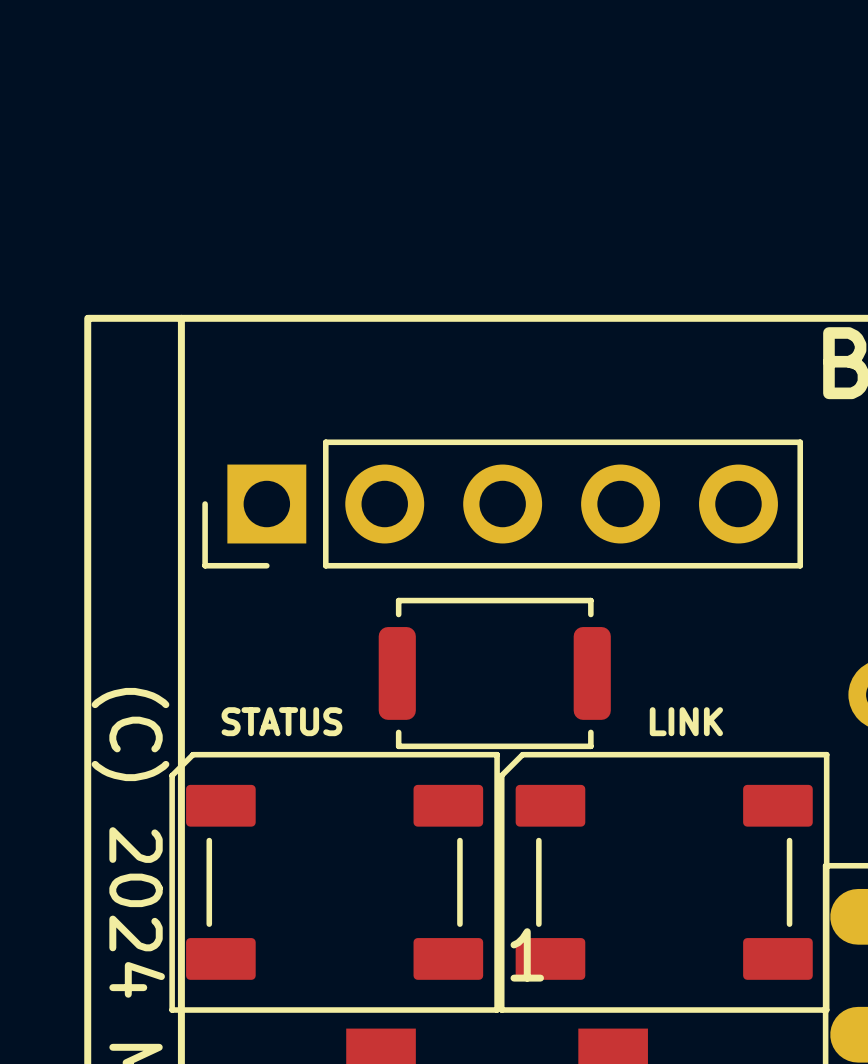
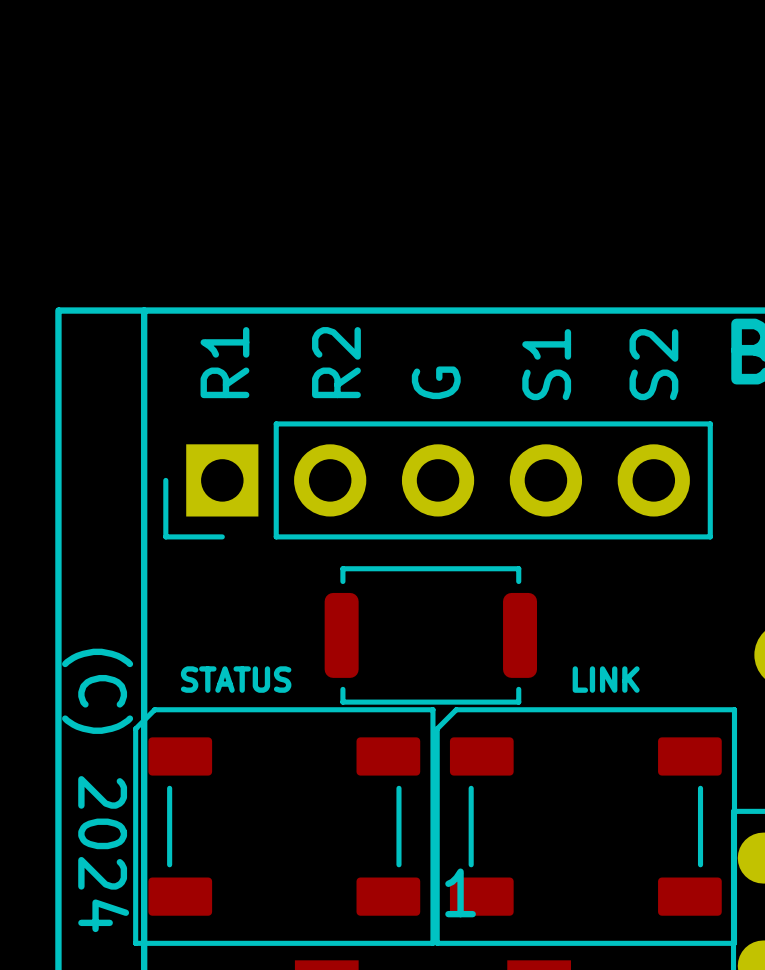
text: none -> R1 (224, 362)
text: none -> R2 (336, 362)
text: none -> S1 (546, 364)
text: none -> S2 (653, 364)
text: none -> G (436, 382)

